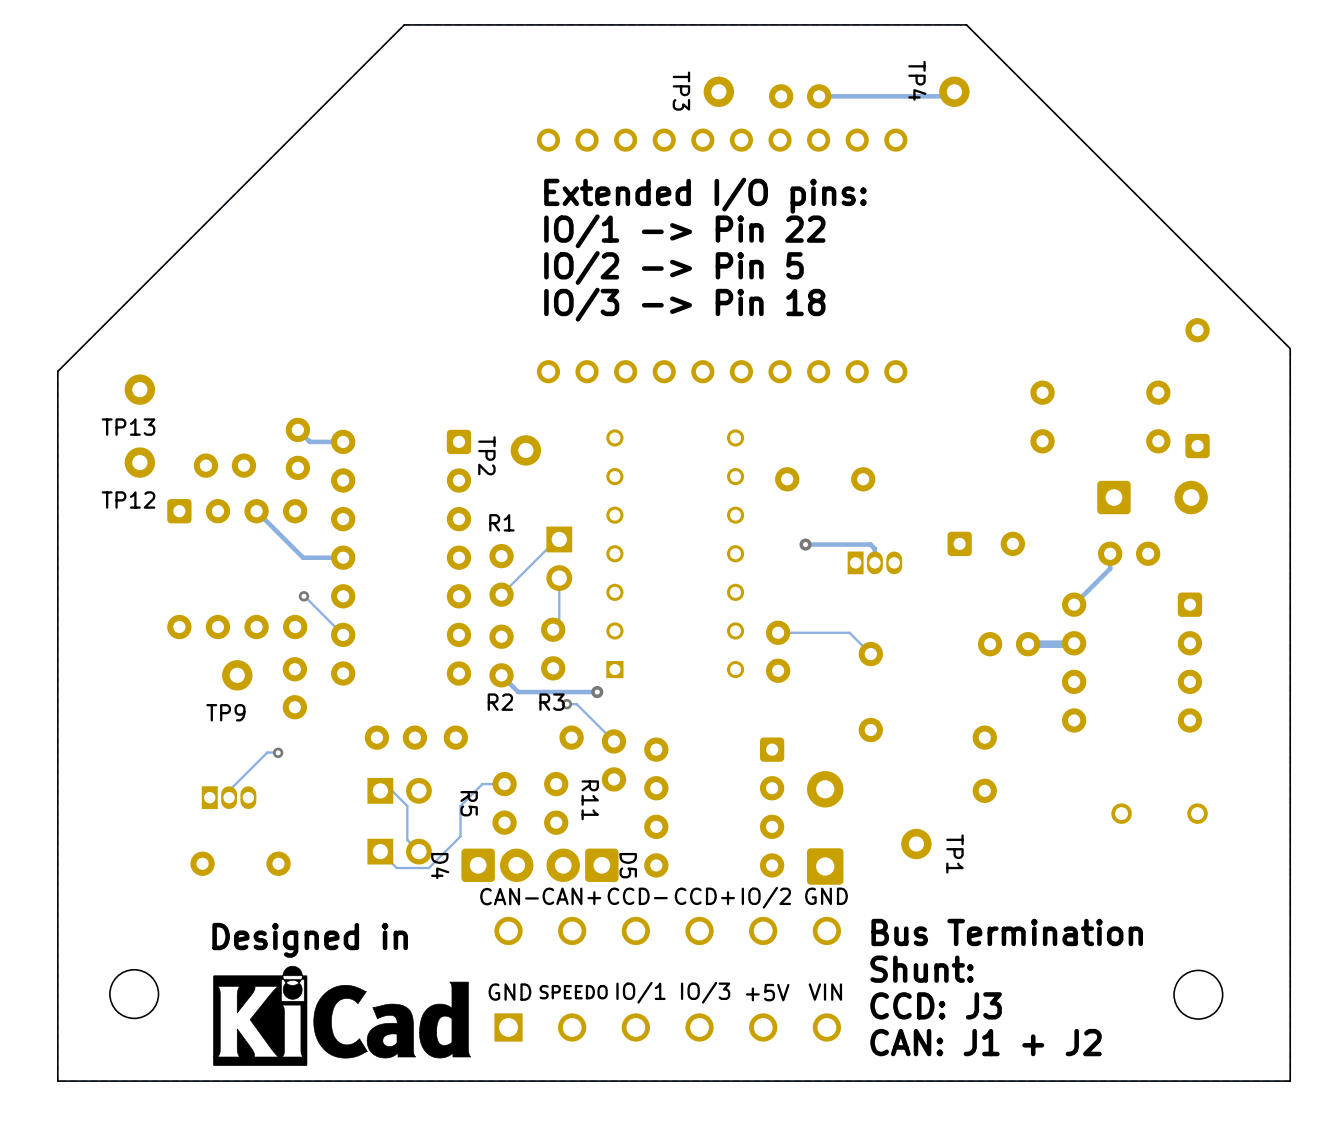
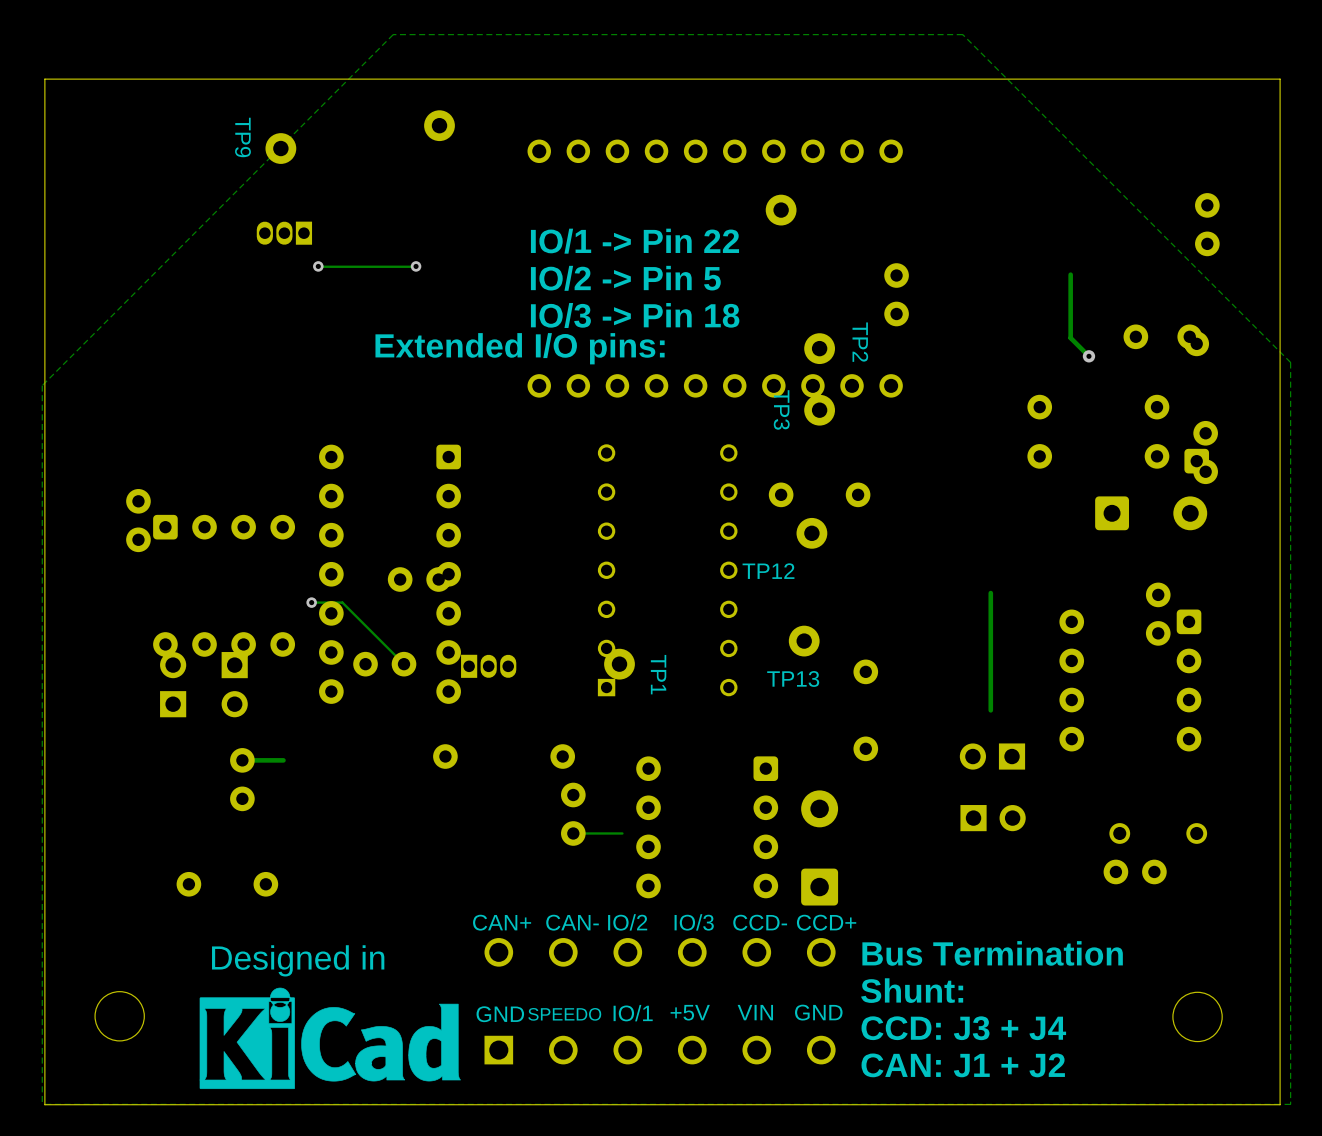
board edge: (966, 24) (404, 24) (57, 371) (57, 1081) (1290, 1081) (1290, 348) (966, 24) -> (1280, 79) (1280, 1104) (44, 1104) (44, 79) (1280, 79)
TP3 position: (718, 91) -> (819, 410)
TP4: (954, 91) -> none
part: (800, 96) -> none
track: (949, 96) (819, 96) -> none
part: none -> (439, 125)
text position: Extended I/O pins: (705, 195) -> Extended I/O pins: (520, 348)
part: none -> (781, 210)
part: none -> (1207, 224)
part: none -> (284, 233)
via: none -> (318, 266)
track: none -> (416, 266) (318, 266)
via: none -> (416, 266)
track: none -> (1070, 274) (1070, 338) (1088, 356)
part: none -> (896, 294)
part: none -> (1162, 336)
via: none -> (1088, 356)
TP13 position: (139, 389) -> (804, 641)
track: (297, 429) (309, 441) (343, 441) -> none
part: none -> (1205, 452)
part: (297, 448) -> none
TP2 position: (525, 450) -> (819, 348)
TP2 name position: TP2 (486, 455) -> TP2 (860, 342)
TP12 position: (139, 462) -> (811, 533)
part: (224, 465) -> none
TP12 name position: TP12 (128, 500) -> TP12 (768, 571)
part: none -> (138, 520)
track: (256, 511) (303, 557) (343, 557) -> none
track: (556, 539) (501, 594) -> none
part: (986, 543) -> none
track: (805, 544) (870, 544) (874, 548) (874, 562) -> none
via: (805, 544) -> none
track: (1110, 553) (1110, 568) (1074, 604) -> none
part rotation: 0° (1129, 553) -> 90° clockwise (1158, 614)
part position: (1129, 553) -> (1158, 614)
part: (559, 558) -> none
part: none -> (419, 579)
part: (874, 562) -> none
R1: (501, 575) -> none
track: none -> (990, 593) (990, 710)
track: (559, 578) (559, 623) -> none
track: none -> (311, 602) (342, 602) (404, 664)
track: (303, 596) (343, 634) -> none
via position: (303, 596) -> (311, 602)
track: (778, 632) (849, 632) (870, 654) -> none
part: (1009, 644) -> none
track: (1073, 644) (1028, 644) -> none
part: none -> (384, 664)
part: none -> (488, 666)
R3: (553, 649) -> none
part: (778, 651) -> none
R2: (501, 656) -> none
part: none -> (173, 684)
part: none -> (234, 684)
TP9 position: (237, 675) -> (280, 148)
track: (501, 675) (518, 692) (597, 692) -> none
part: (294, 688) -> none
via: (597, 692) -> none
track: (566, 704) (576, 704) (613, 741) -> none
via: (566, 704) -> none
TP9 name rotation: 0° (225, 712) -> 90° clockwise (242, 137)
TP9 name position: TP9 (225, 712) -> TP9 (242, 137)
part: (395, 737) -> none
part: none -> (992, 756)
track: none -> (283, 760) (242, 760)
track: (278, 752) (267, 752) (229, 790) -> none
via: (278, 752) -> none
part: none -> (242, 779)
part position: (613, 760) -> (573, 814)
part: (984, 764) -> none
track: (504, 784) (482, 784) (460, 806) (460, 836) (428, 868) (396, 868) (380, 851) -> none
track: (392, 790) (407, 806) (407, 839) (418, 851) -> none
part: (399, 790) -> none
part: (229, 797) -> none
part: none -> (993, 818)
R5: (504, 803) -> none
R11: (556, 803) -> none
track: none -> (622, 833) (573, 833)
TP1 position: (916, 844) -> (619, 664)
part: (399, 851) -> none
part: none -> (1135, 871)
D4: (497, 865) -> none
D5: (582, 865) -> none
text position: CAN- (509, 896) -> CAN- (572, 922)
text position: CAN+ (571, 896) -> CAN+ (502, 922)
text position: CCD- (637, 896) -> CCD- (760, 922)
text position: CCD+ (704, 896) -> CCD+ (826, 922)
text position: GND (826, 896) -> GND (818, 1012)
text position: IO/2 (766, 897) -> IO/2 (627, 922)
text position: IO/3 (705, 992) -> IO/3 (694, 922)
text position: +5V (767, 992) -> +5V (690, 1012)
text position: VIN (825, 992) -> VIN (755, 1012)
text: CCD: J3 (936, 1005) -> CCD: J3 + J4 (963, 1028)

